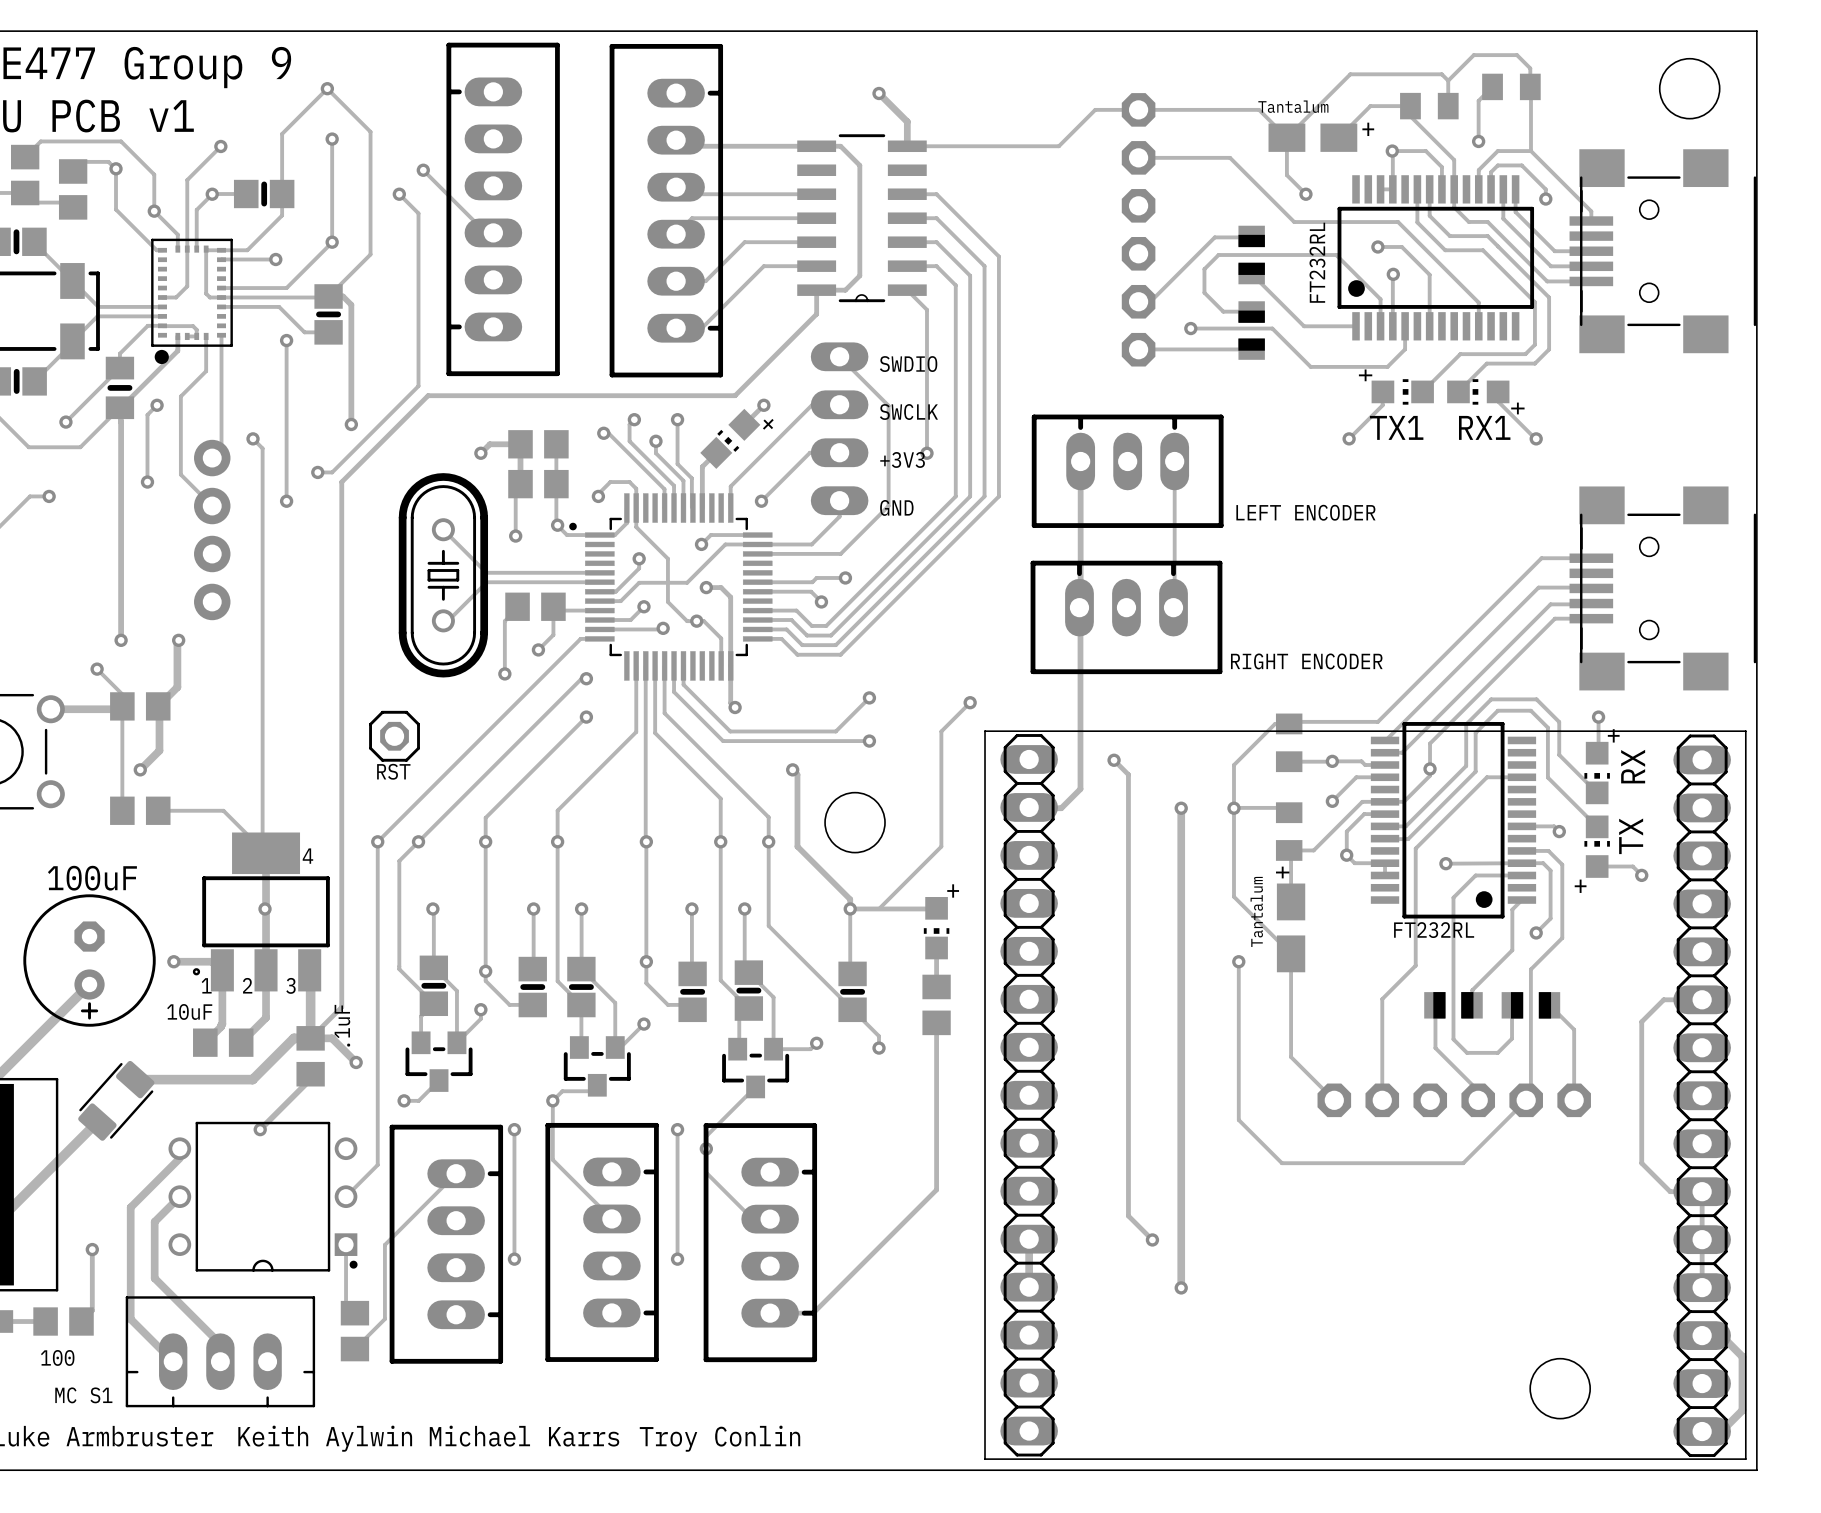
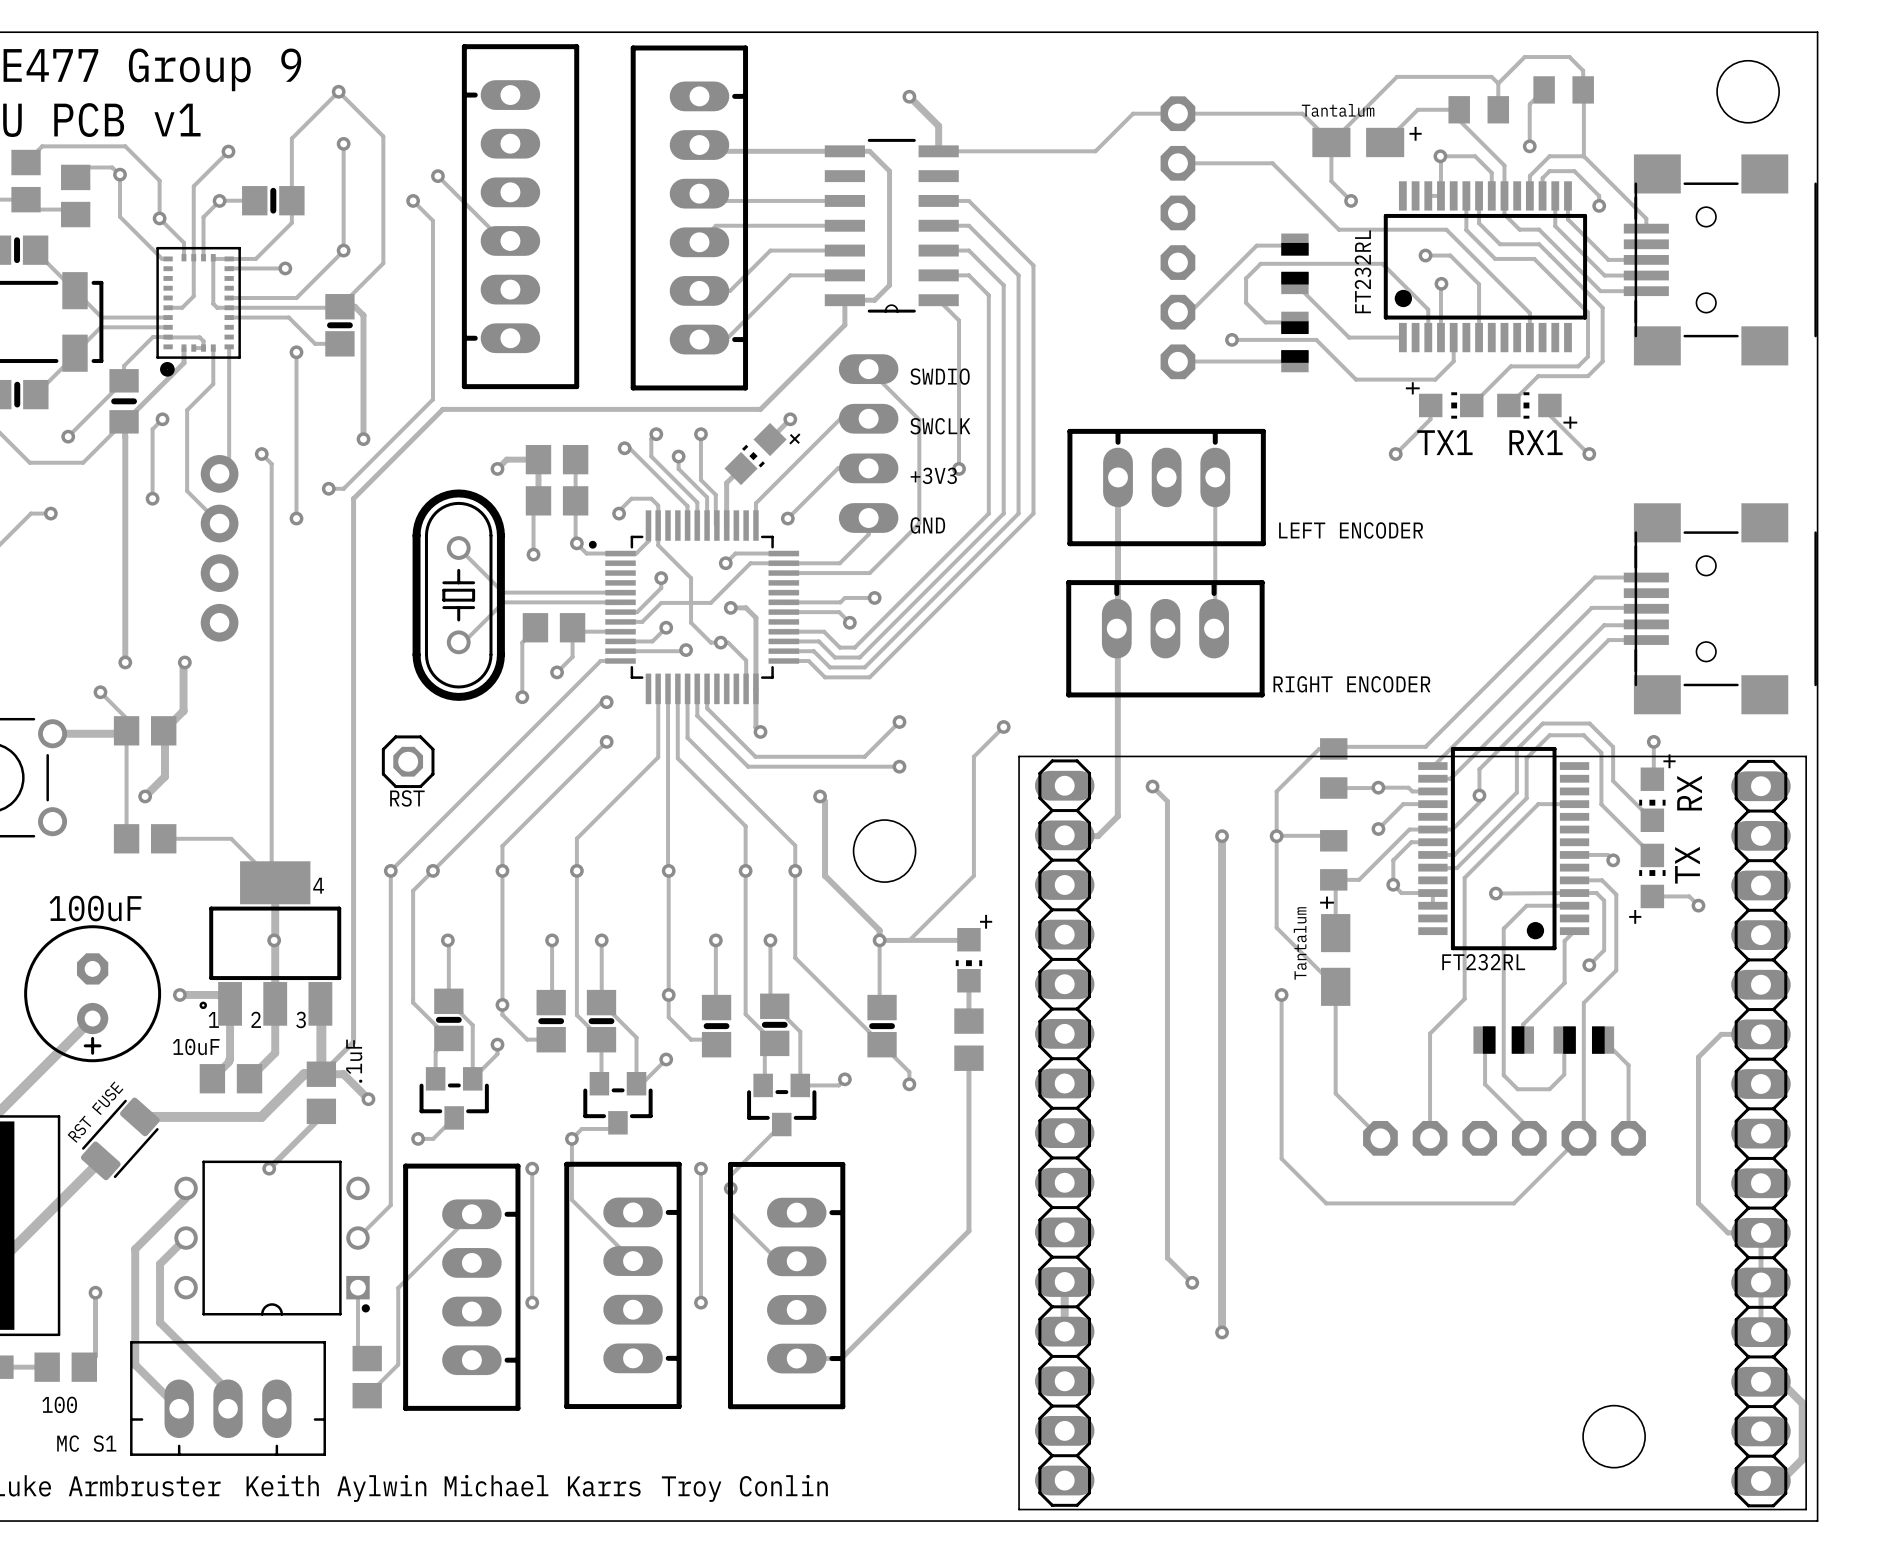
text: none -> RST FUSE (95, 1112)

